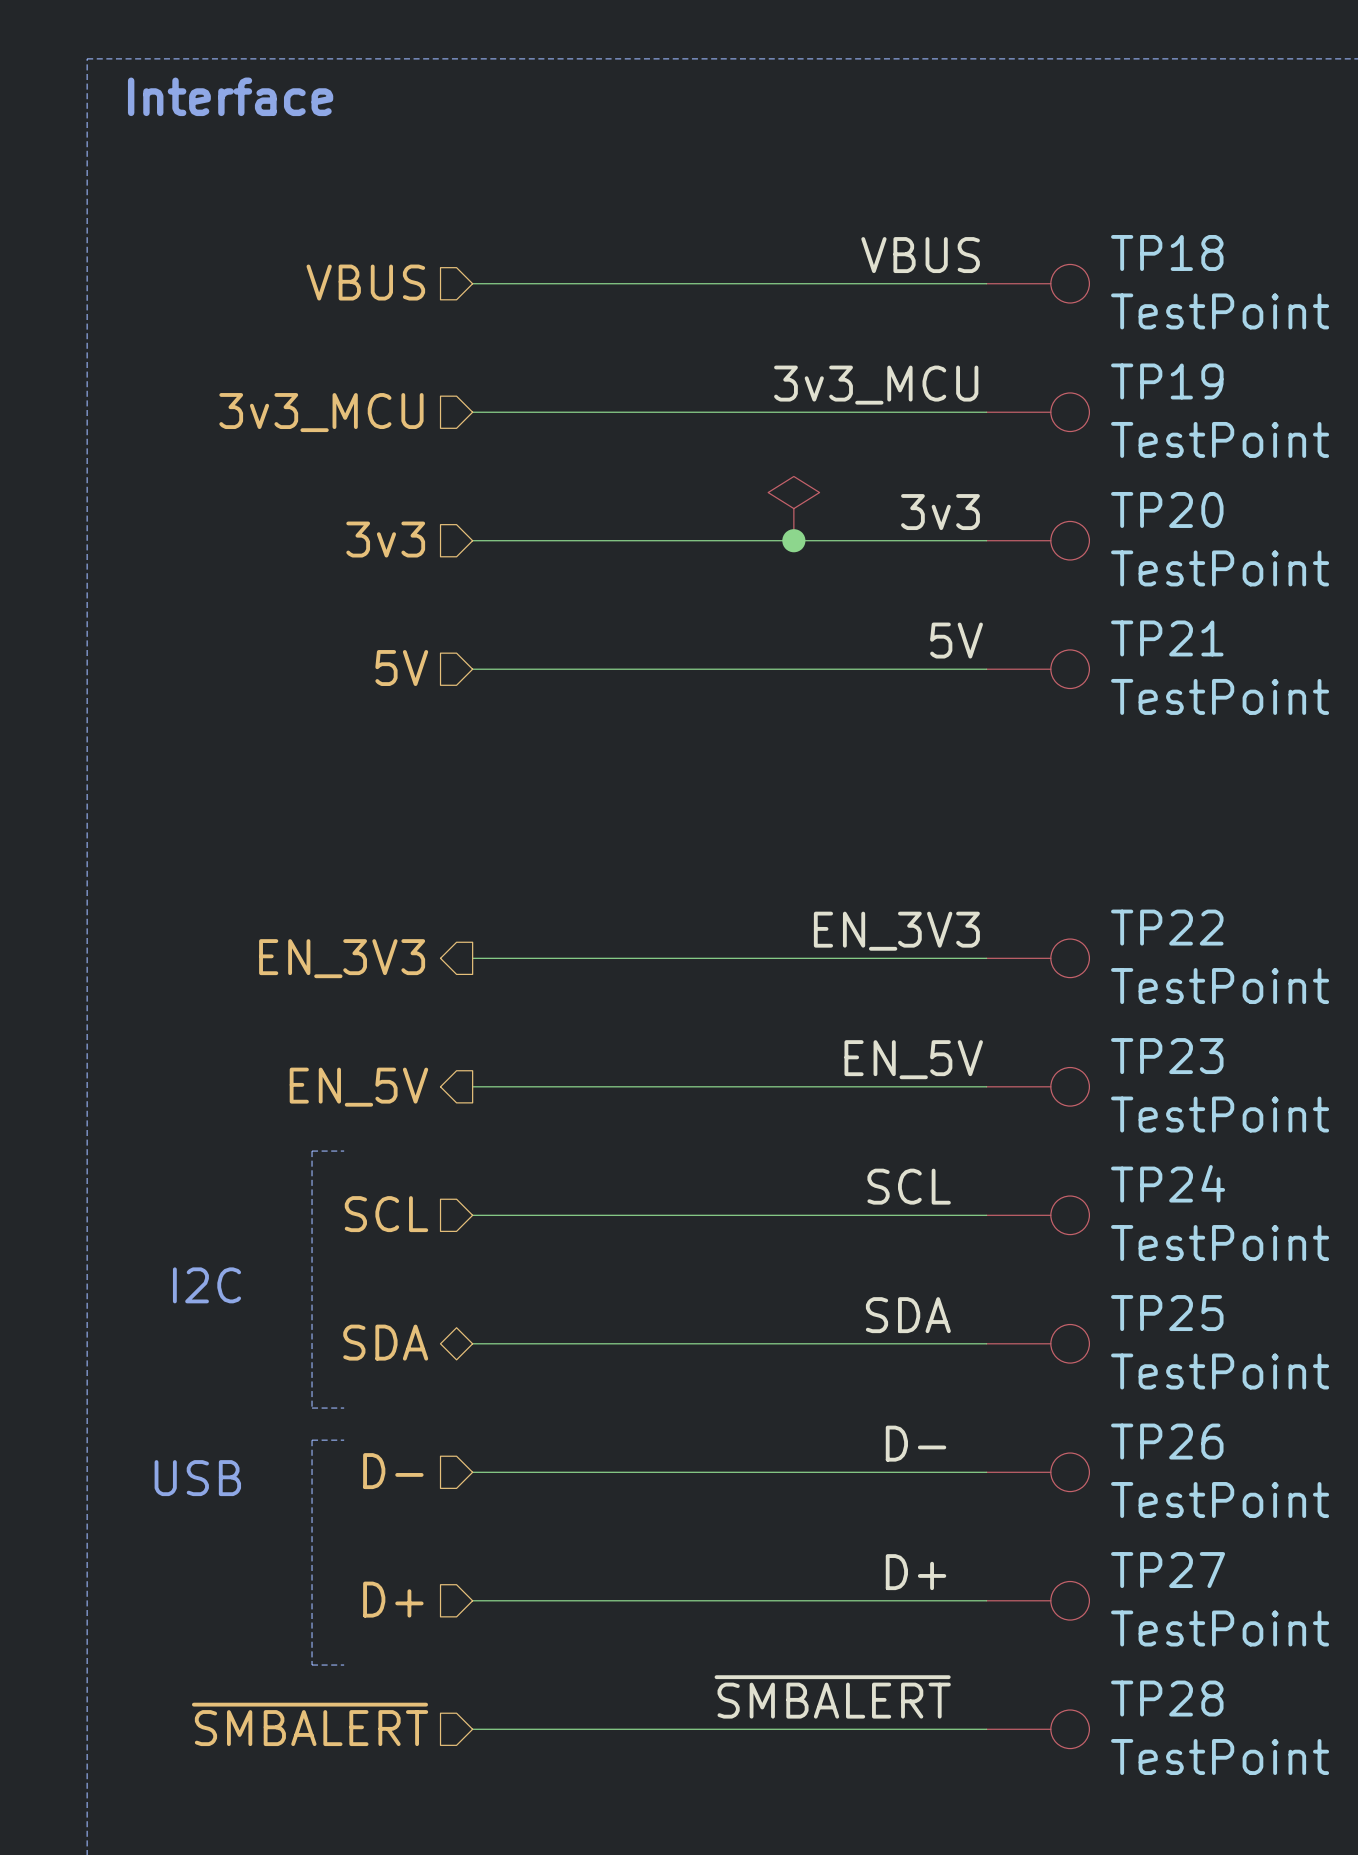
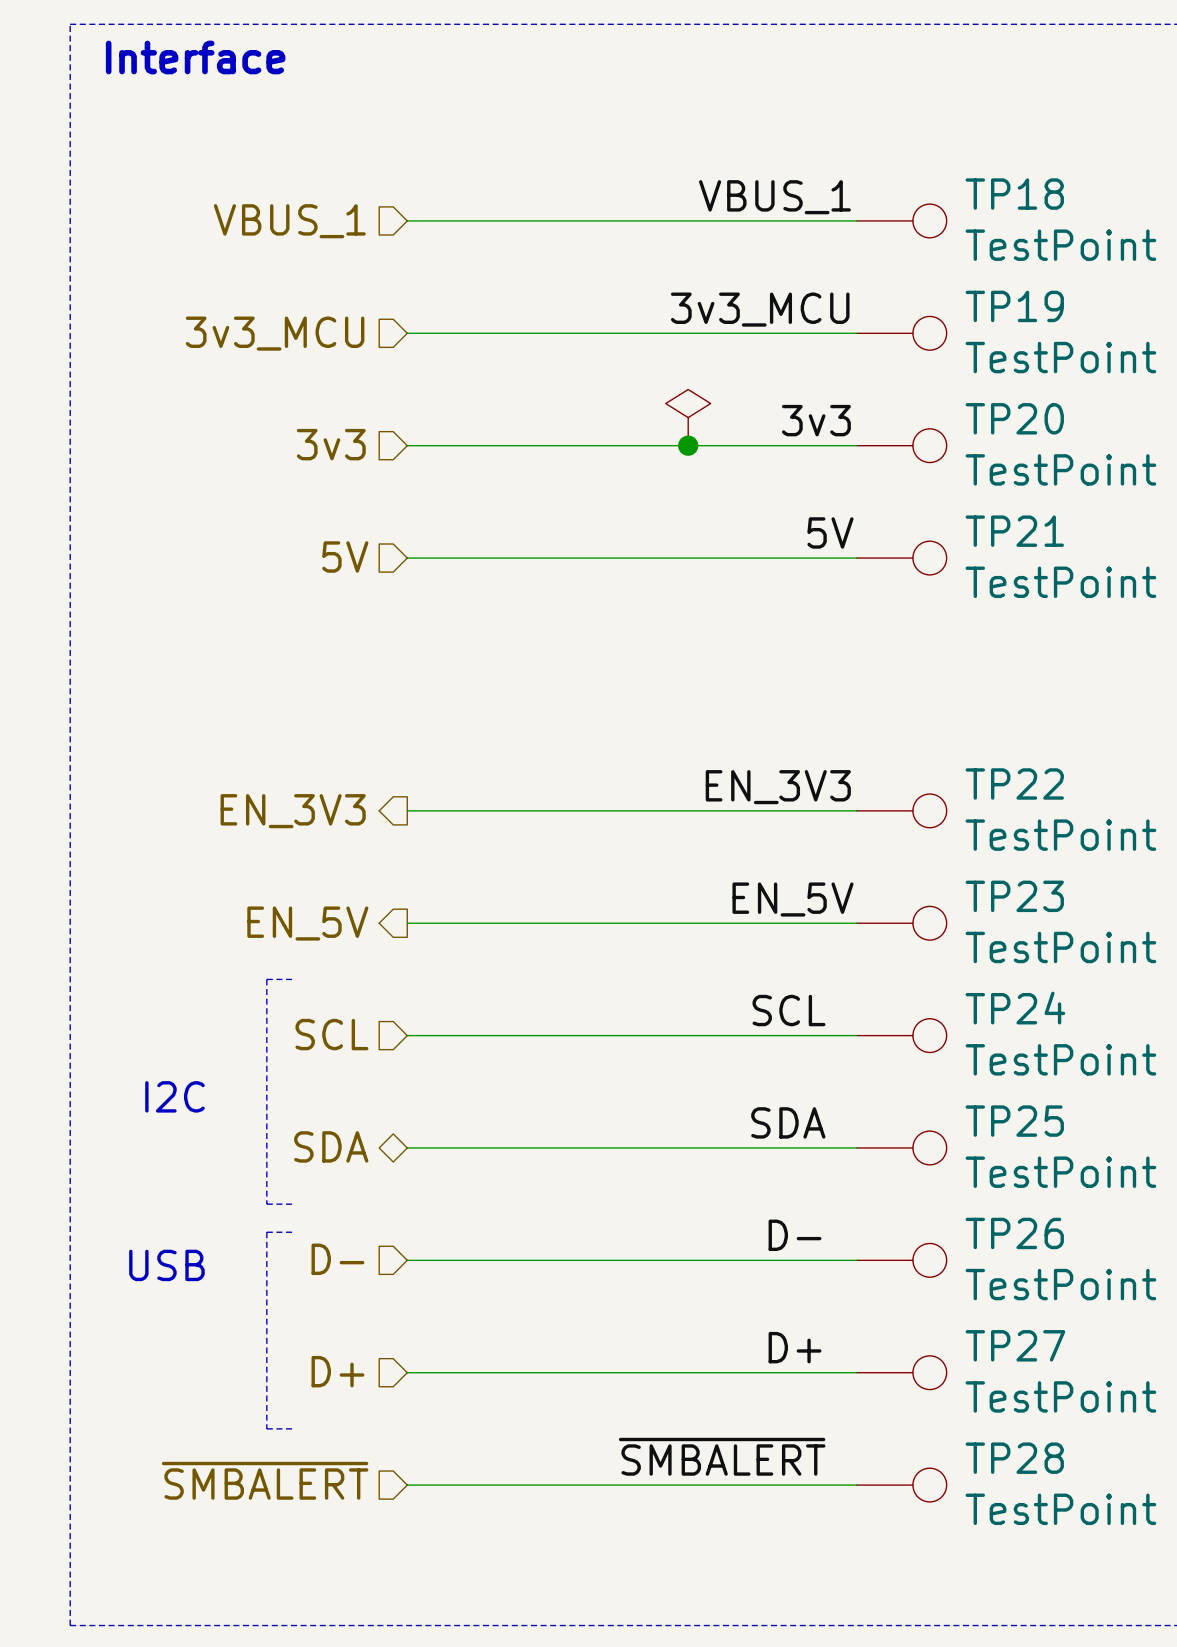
label: VBUS (920, 255) -> VBUS_1 (774, 197)
hierarchical label: VBUS (365, 282) -> VBUS_1 (289, 221)

